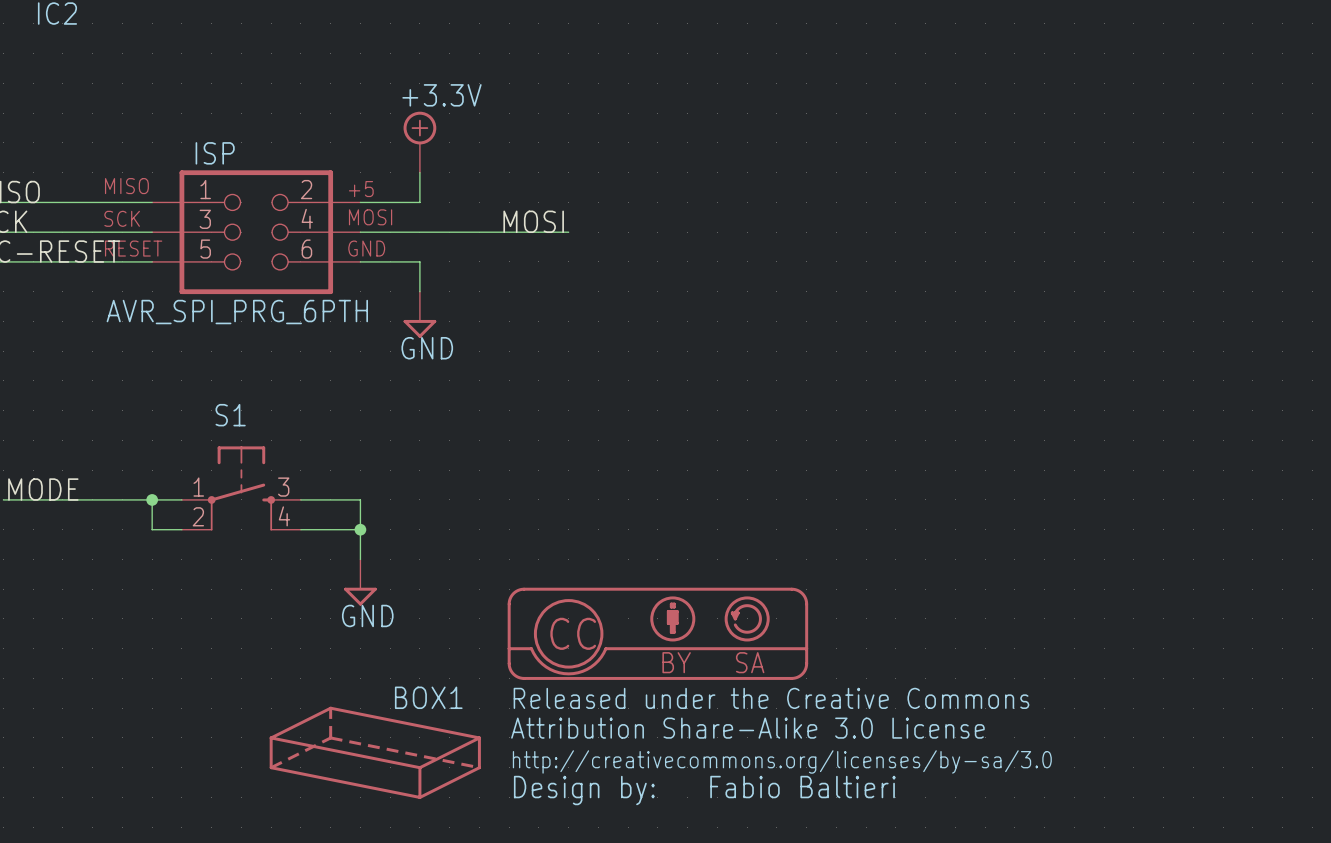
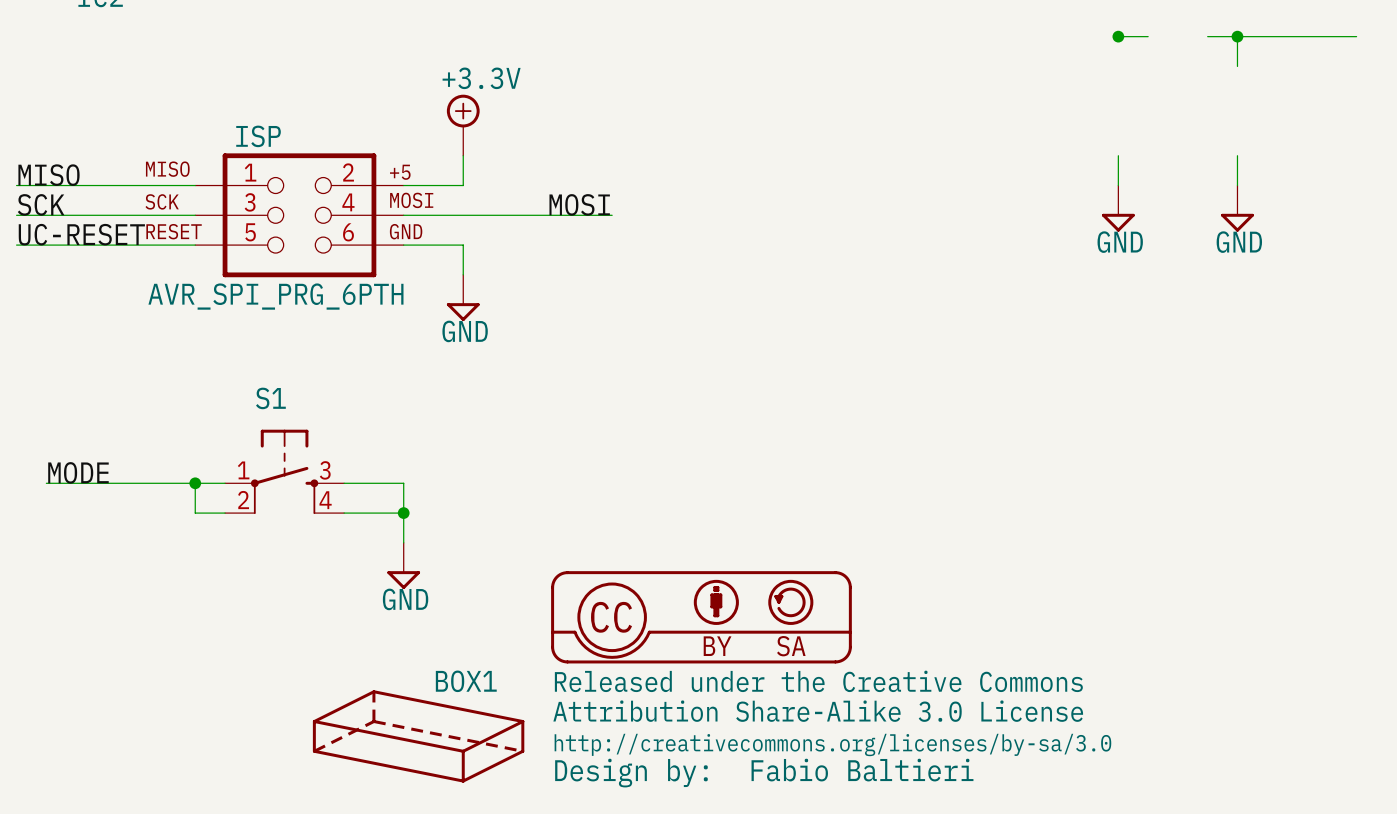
wire: none -> (1118, 36) (1148, 36)
junction: none -> (1118, 36)
wire: none -> (1207, 36) (1356, 36)
wire: none -> (1237, 36) (1237, 66)
junction: none -> (1237, 36)
wire: none -> (1118, 155) (1118, 185)
wire: none -> (1237, 155) (1237, 185)
power symbol: none -> GND (1118, 208)
power symbol: none -> GND (1237, 208)

